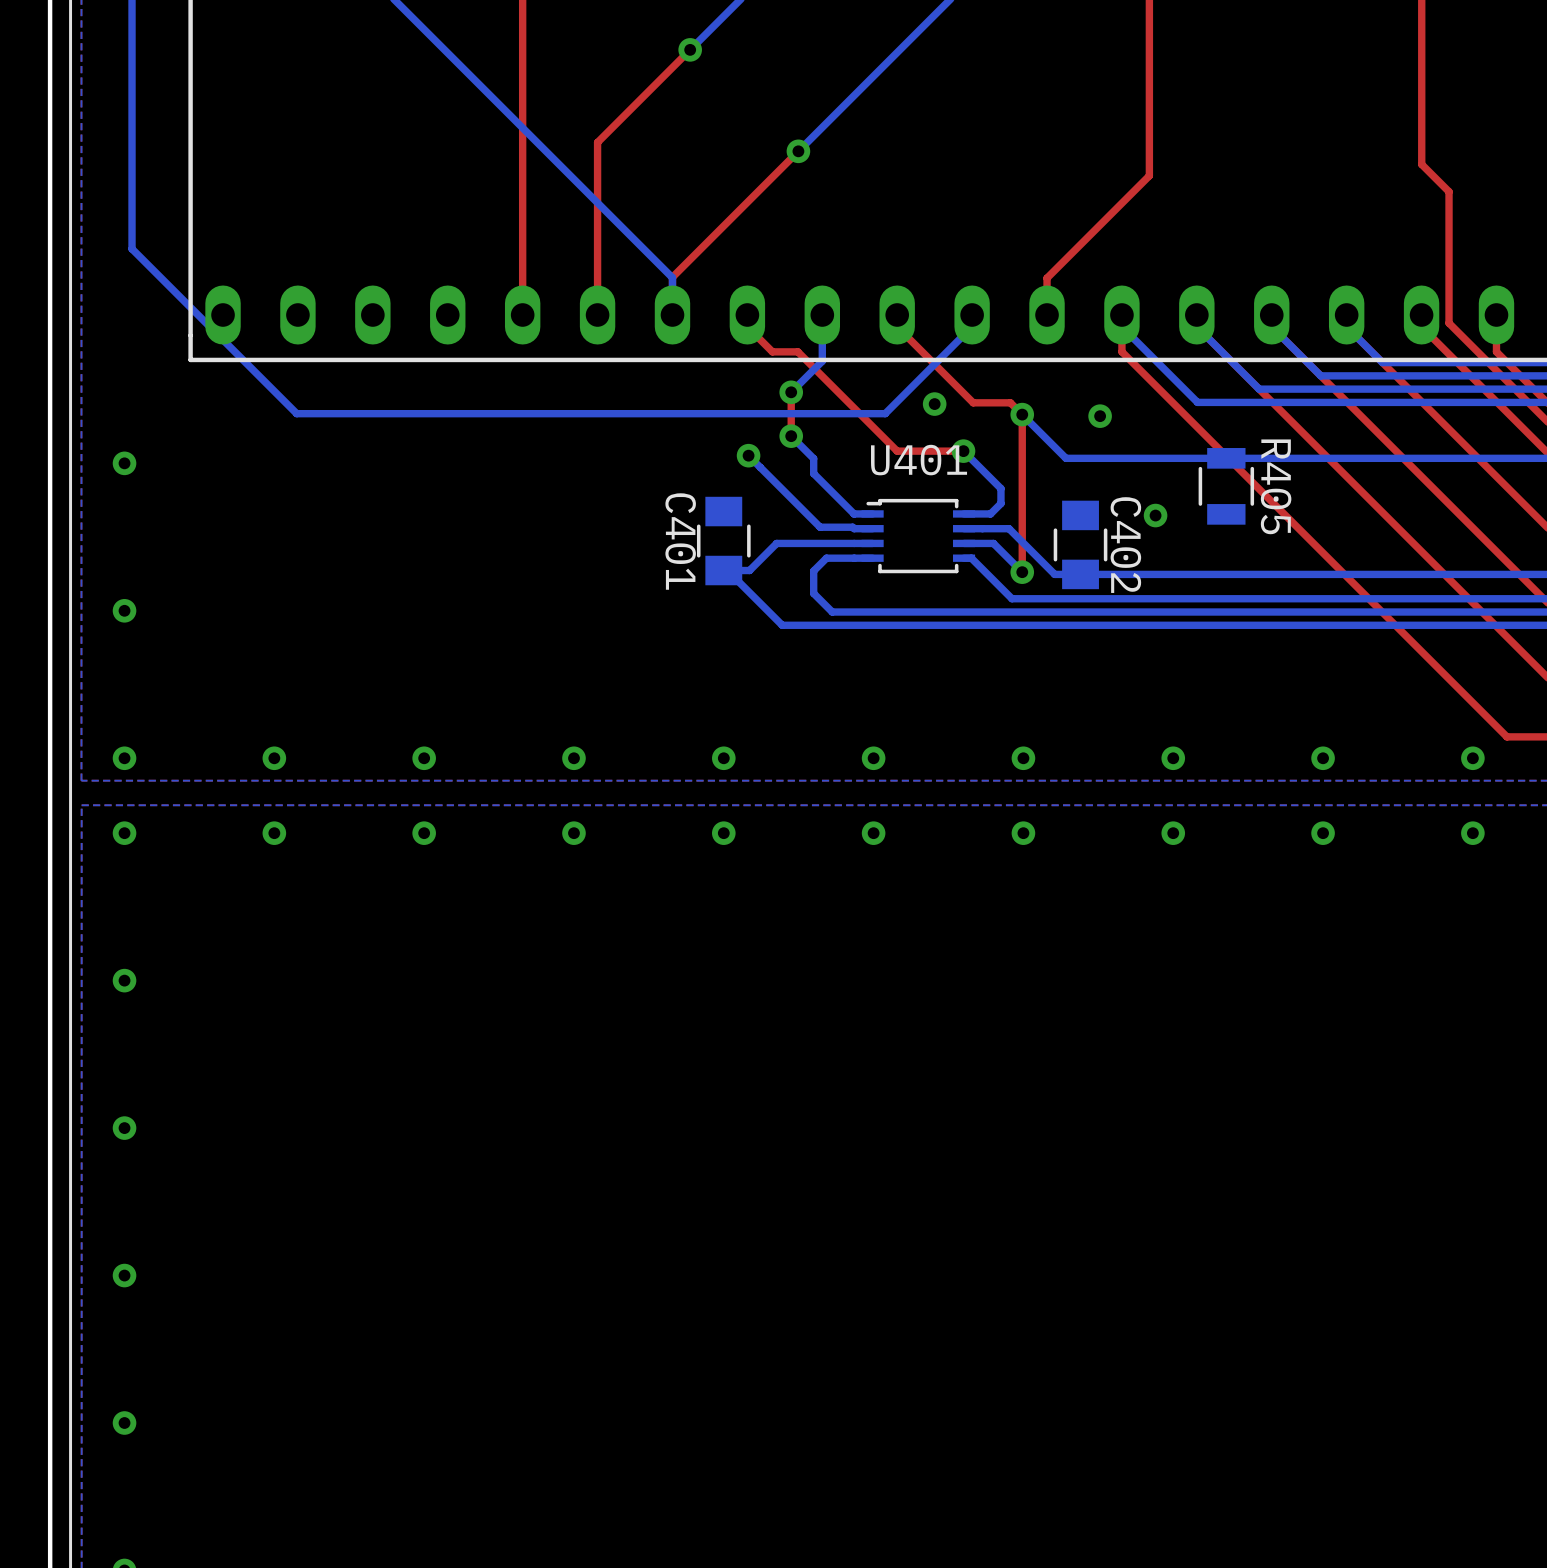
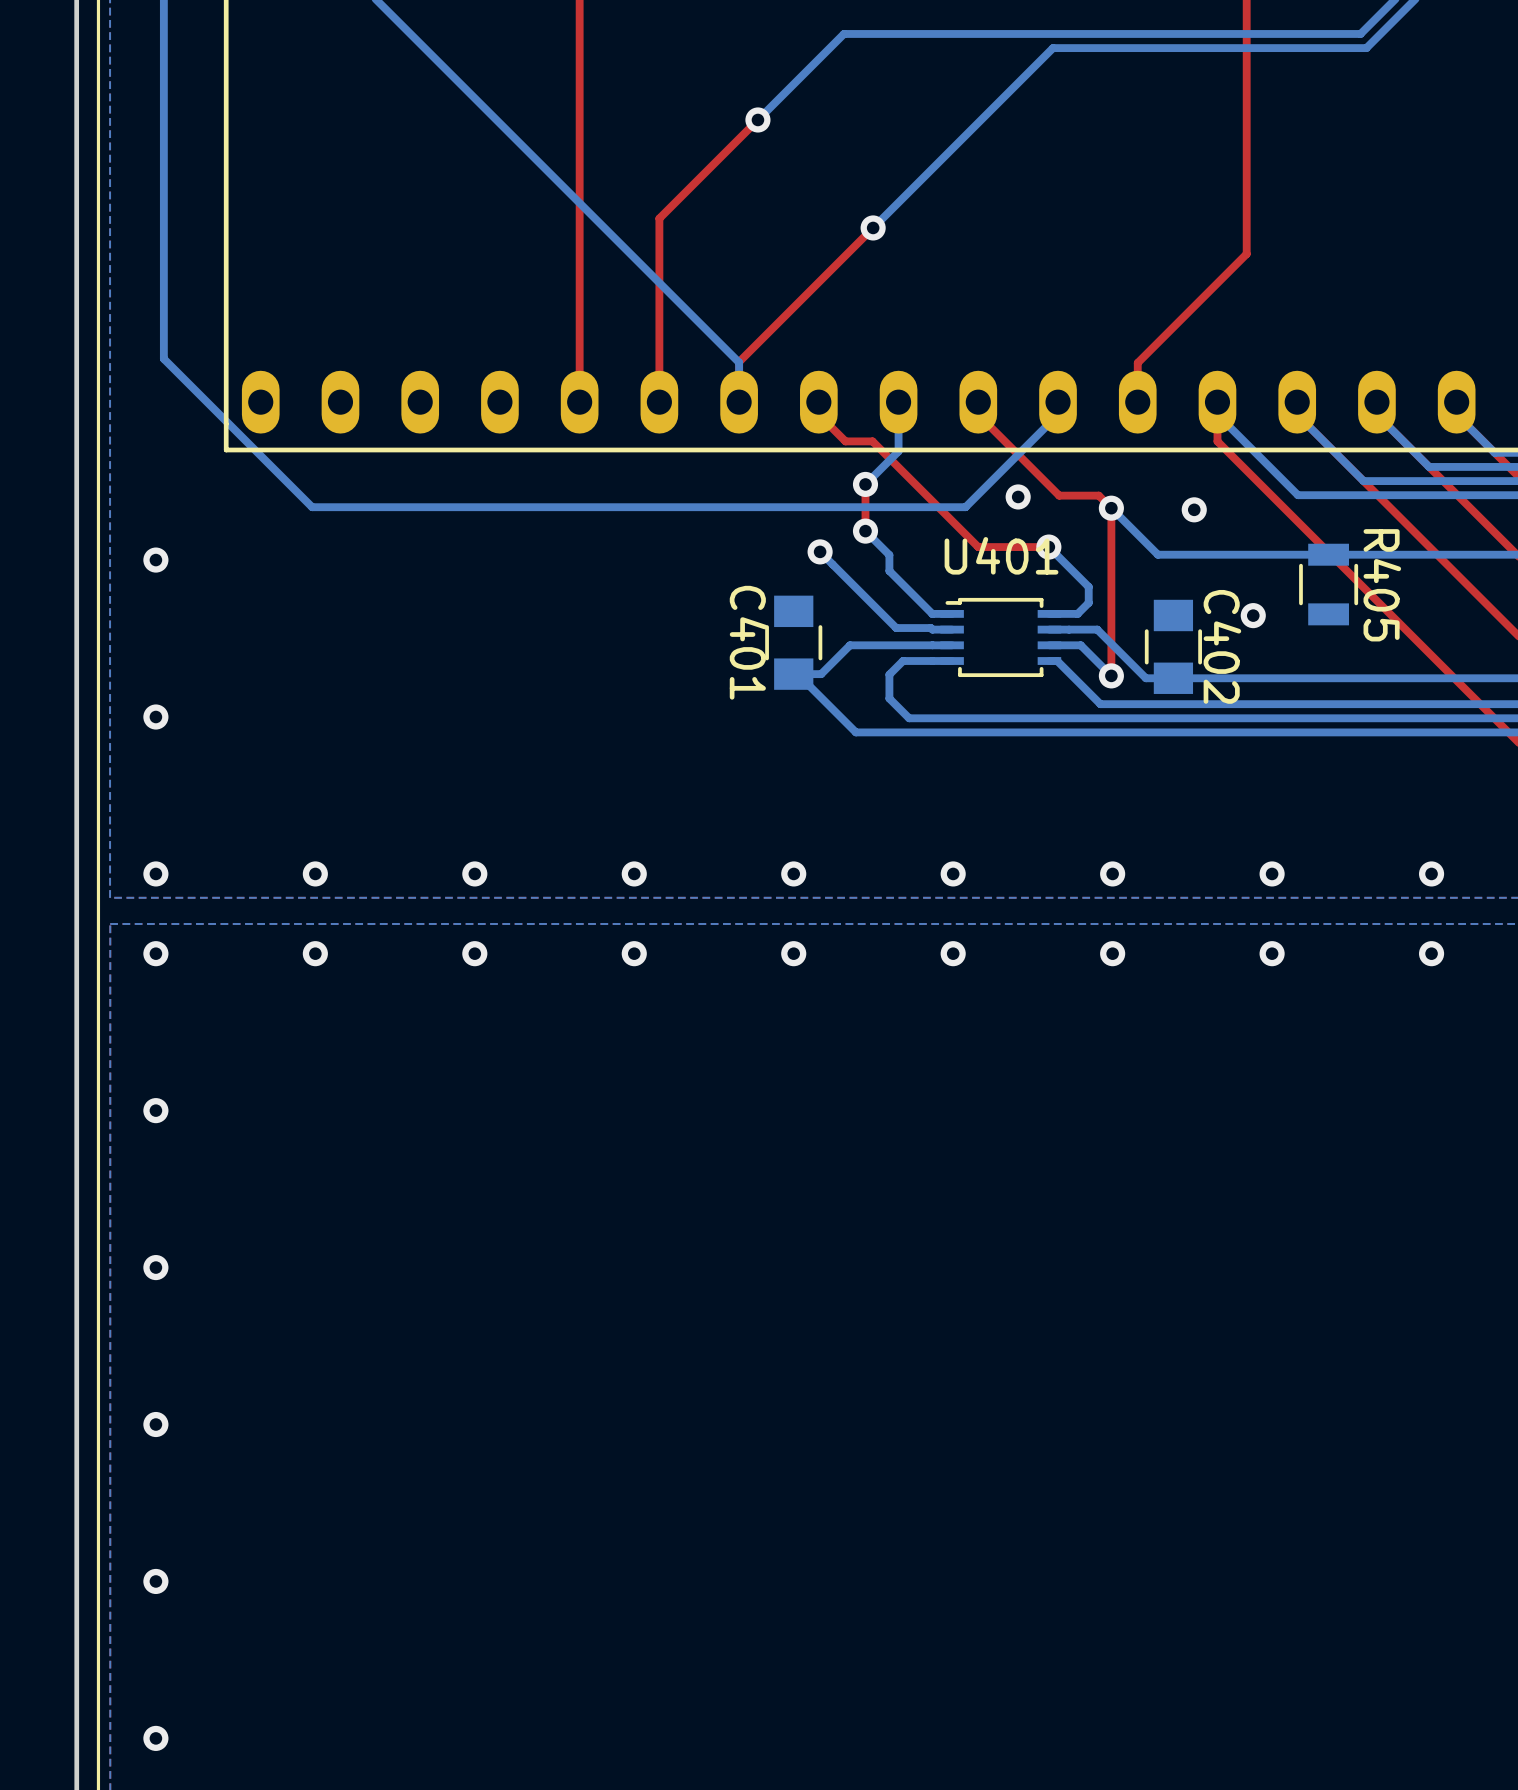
bottom track: (132, 248) (296, 413) -> (163, 331) (163, 358) (312, 507) (339, 507)

